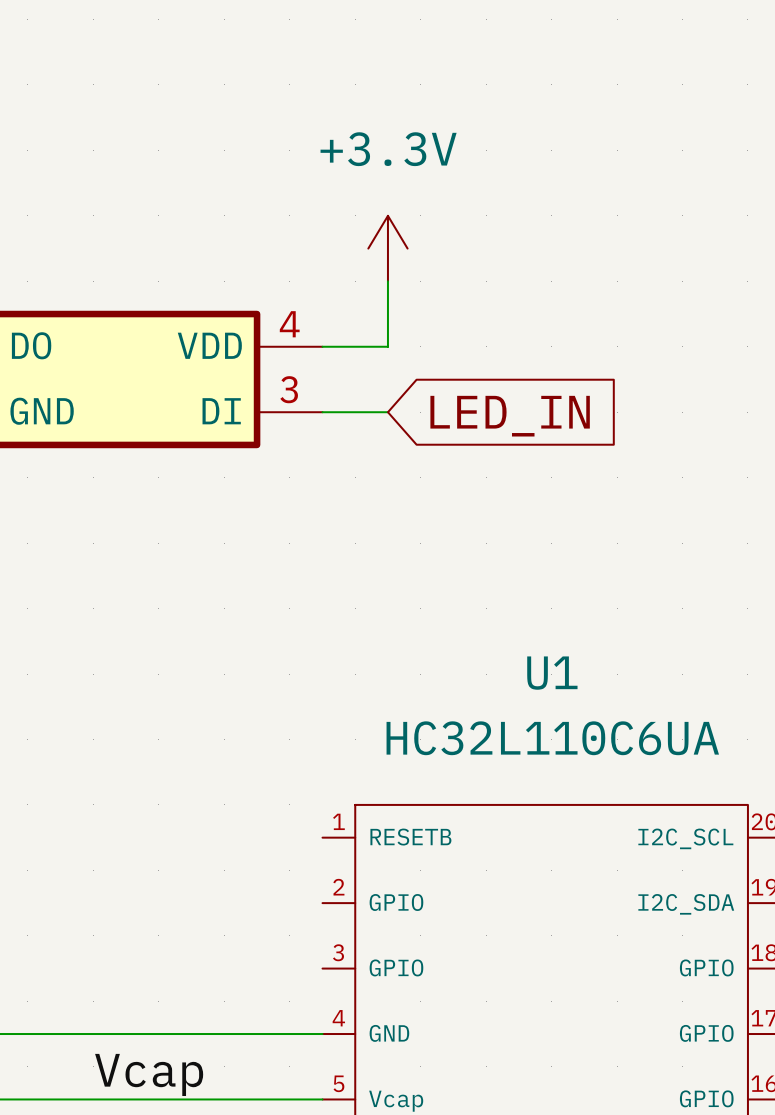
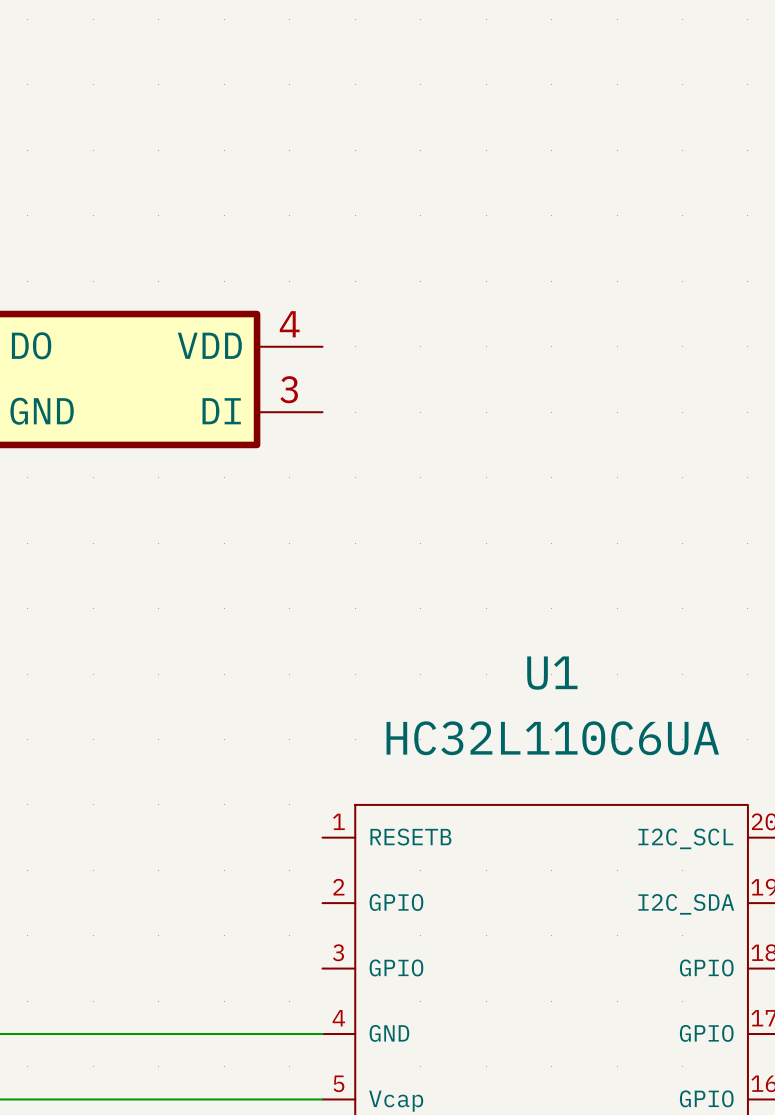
power symbol: +3.3V (387, 248) -> none
wire: (387, 281) (387, 346) (322, 346) -> none
wire: (322, 412) (387, 412) -> none
global label: LED_IN (510, 416) -> none
label: Vcap (149, 1074) -> none

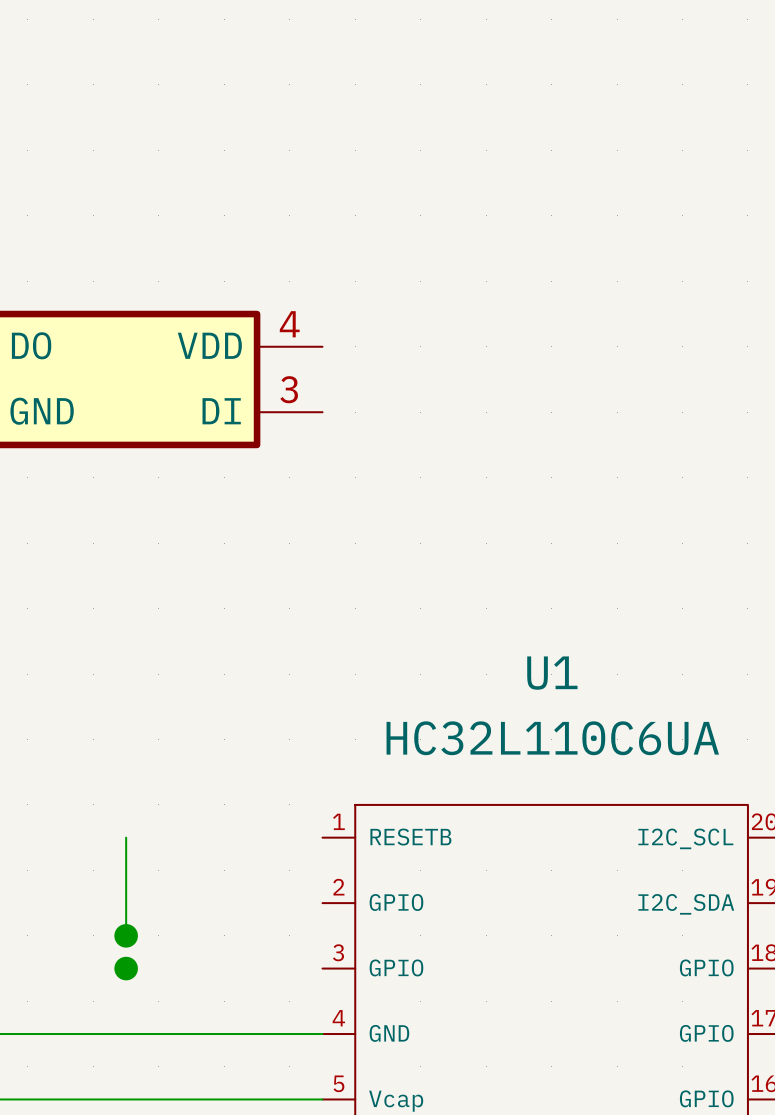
wire: none -> (126, 837) (126, 935)
junction: none -> (126, 935)
junction: none -> (126, 968)

